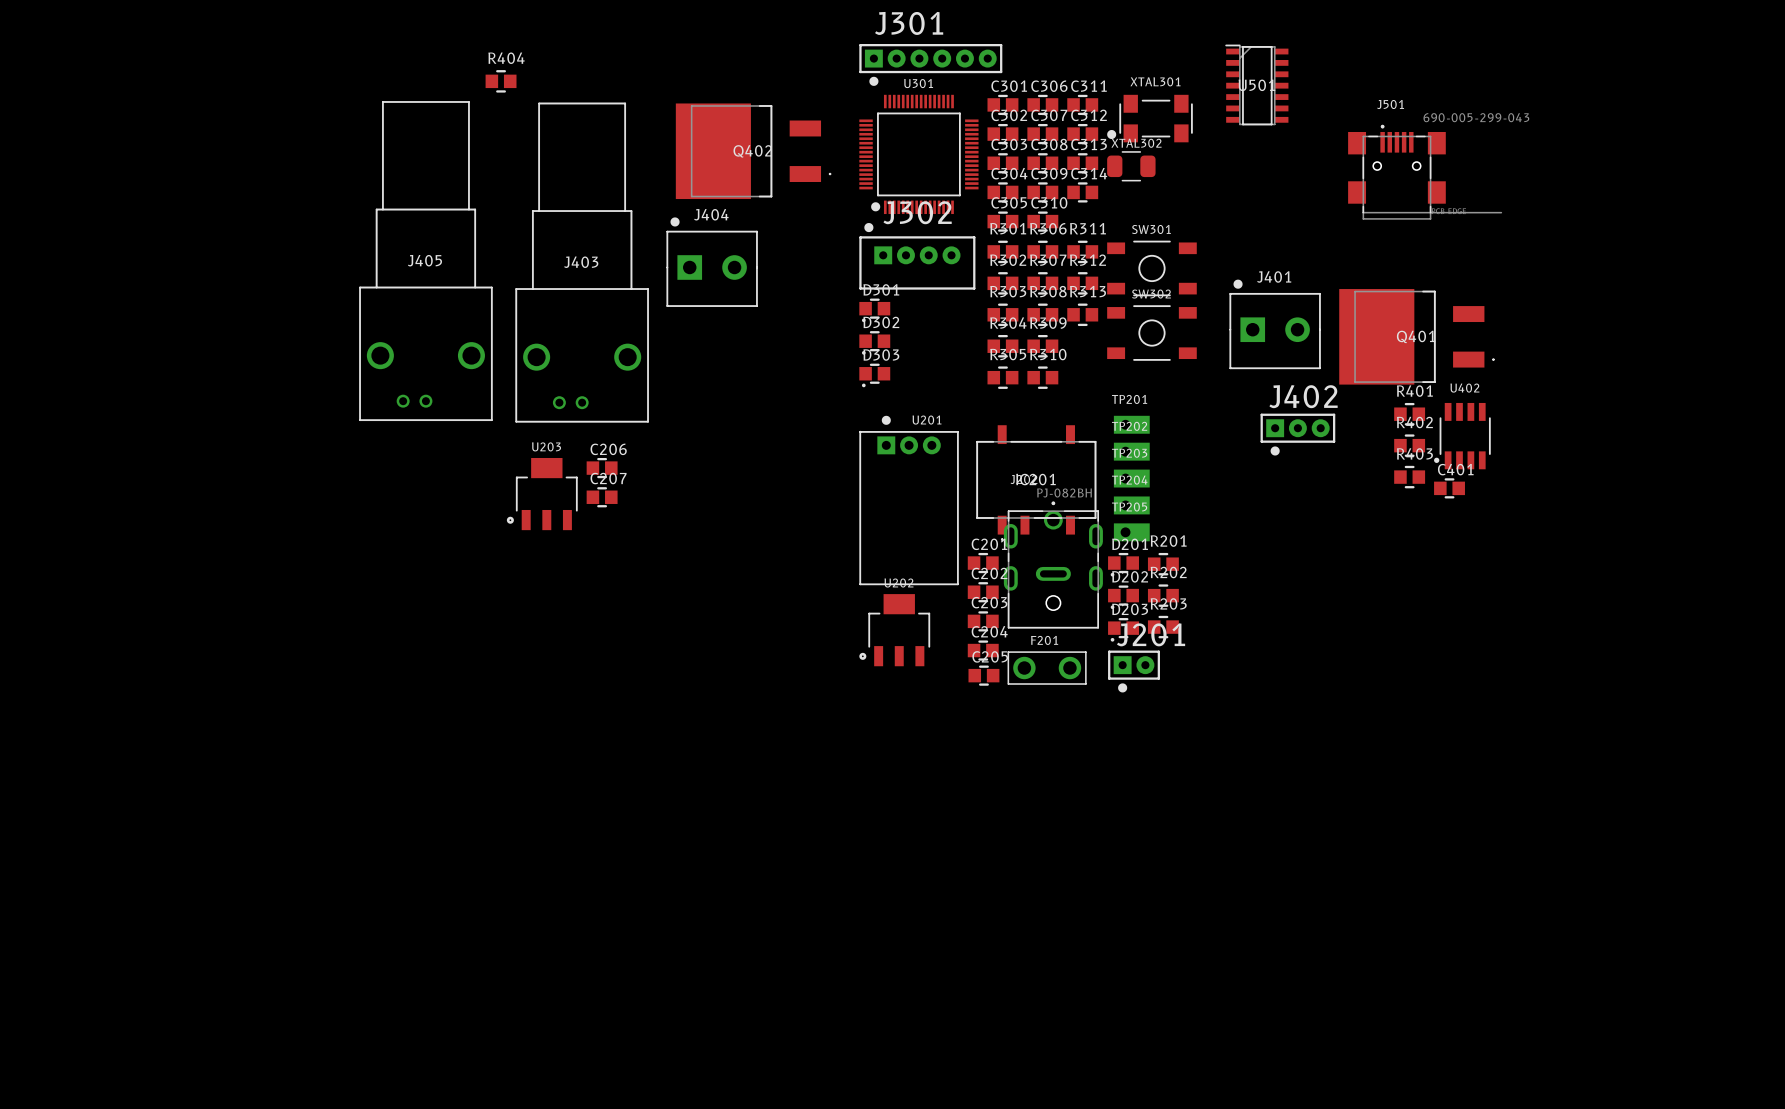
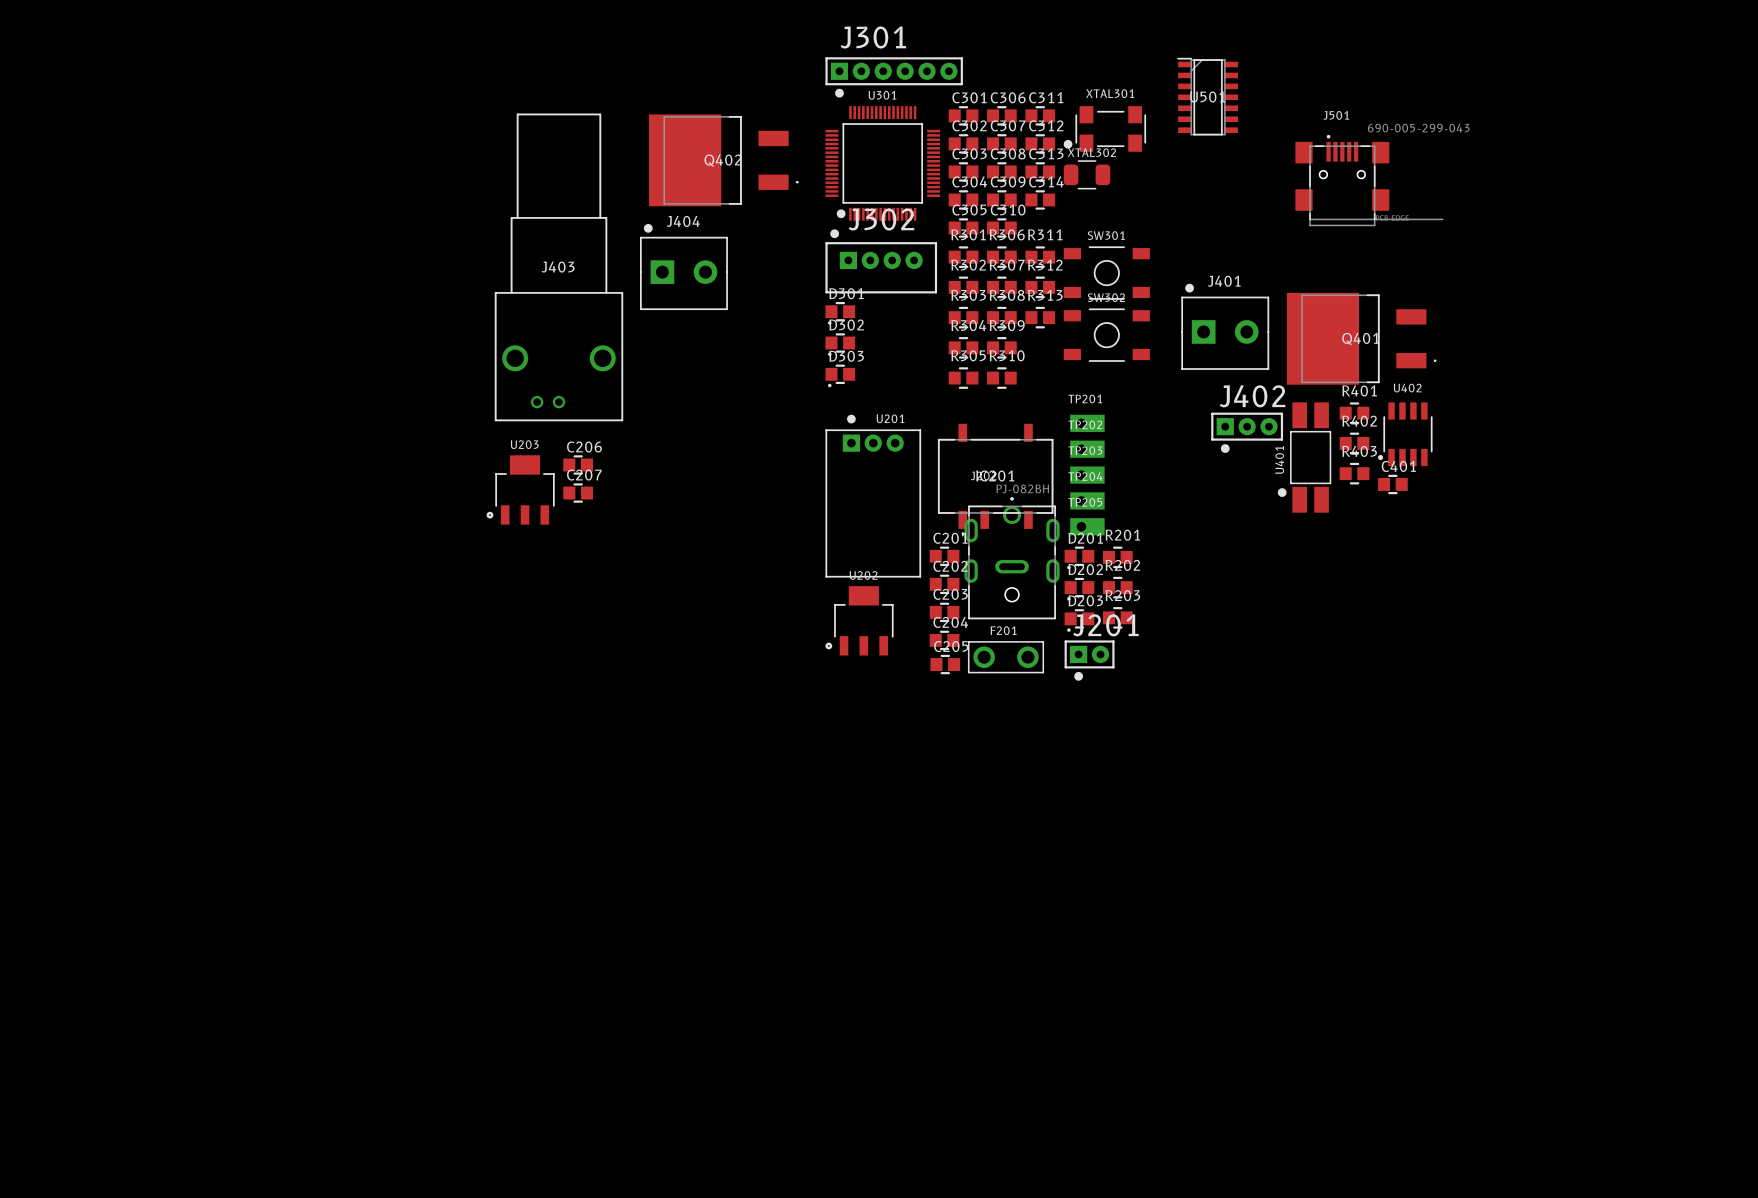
R404: (501, 81) -> none
J405: (425, 261) -> none
U401: none -> (1304, 457)

